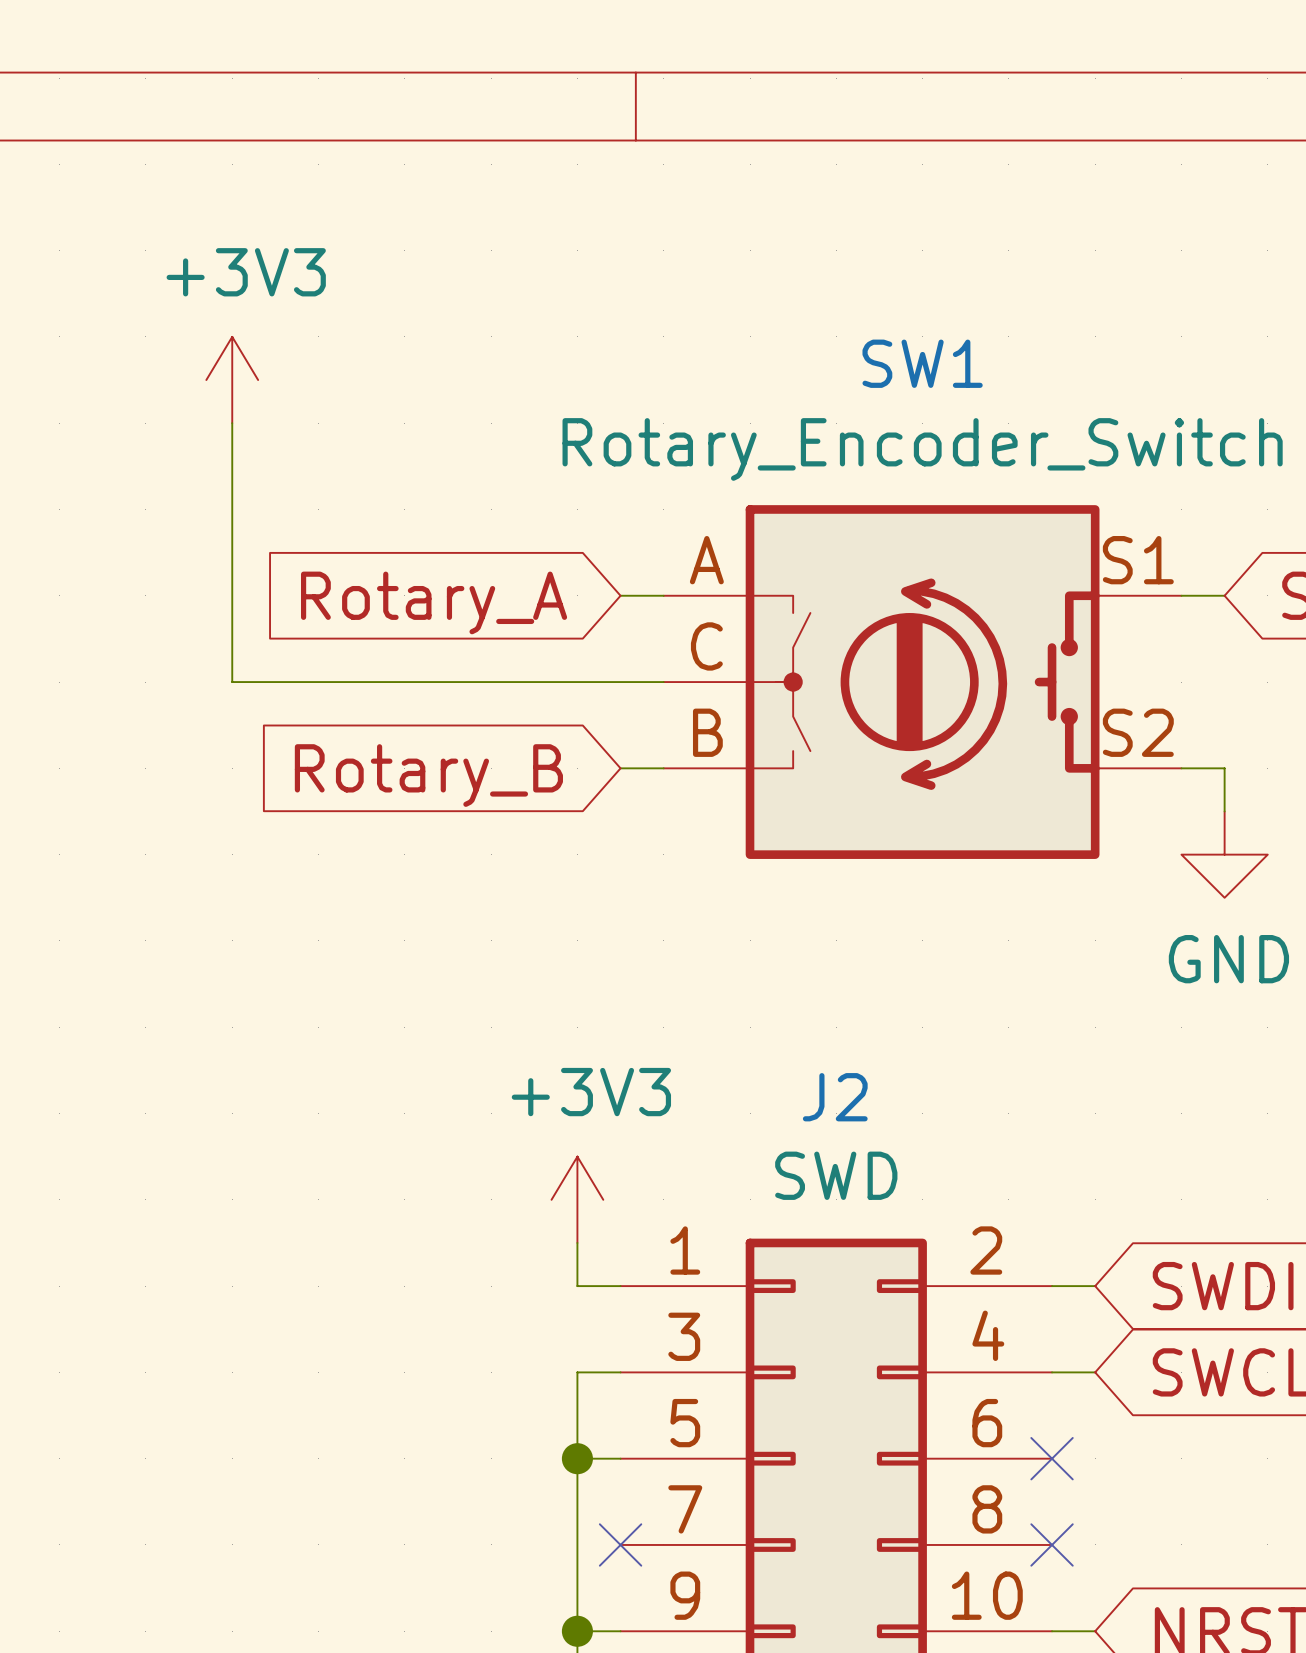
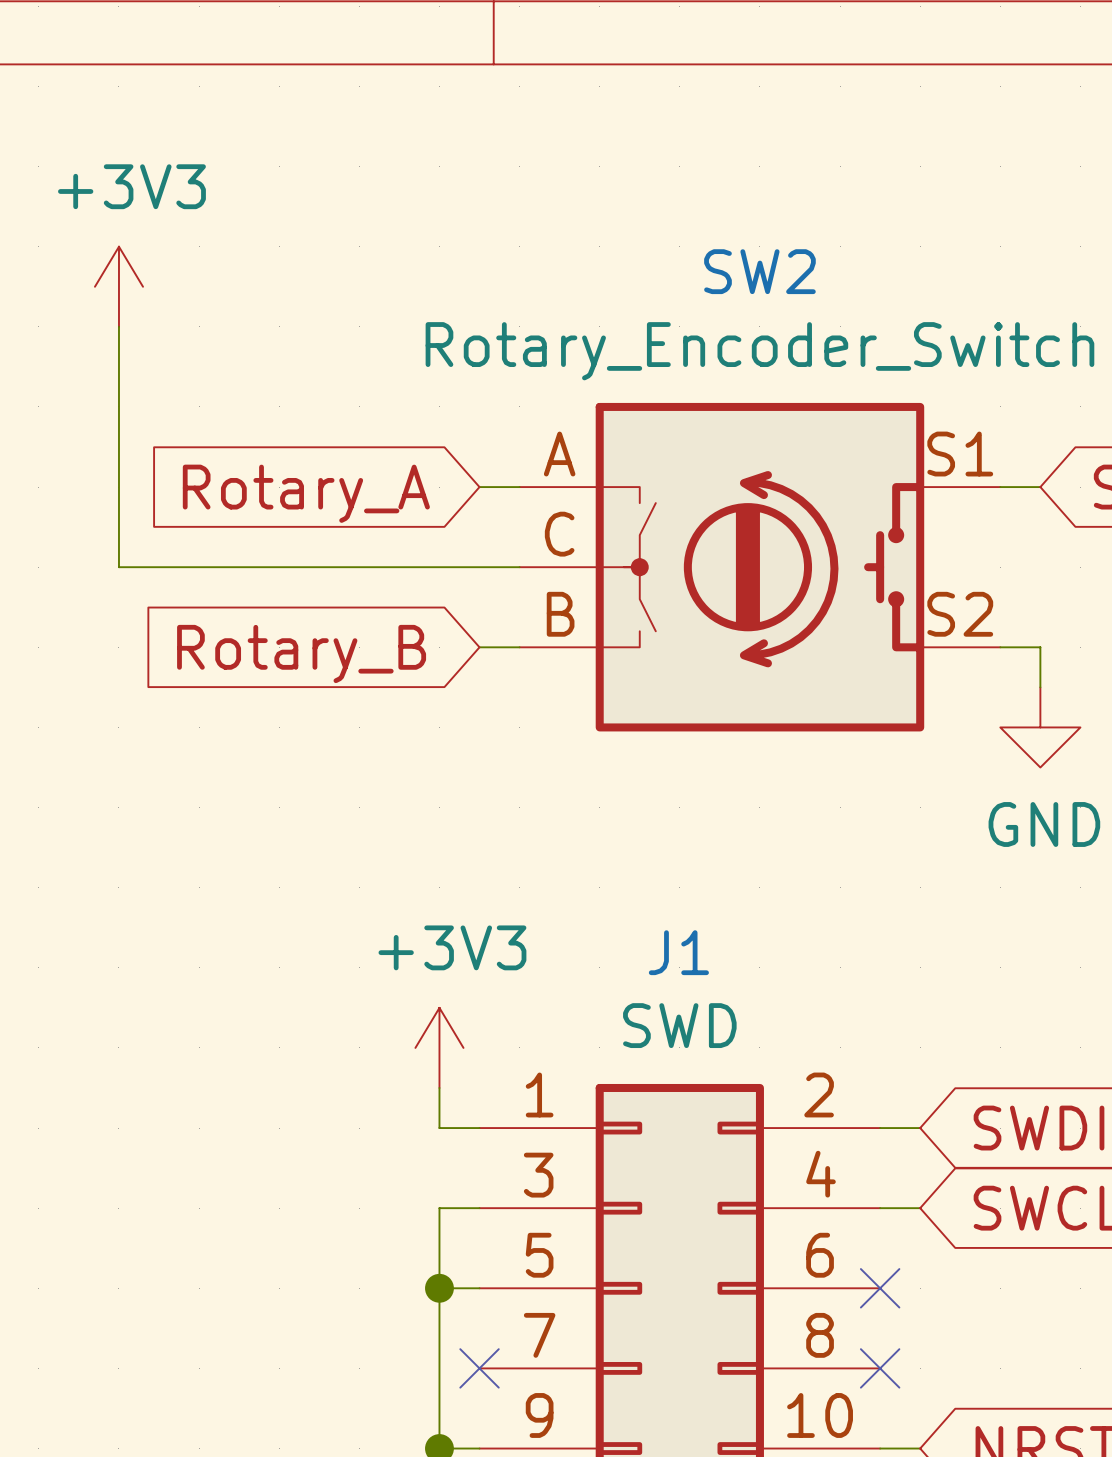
SW1 name: SW1 (922, 363) -> SW2 (759, 271)
J2 name: J2 (835, 1097) -> J1 (678, 952)

